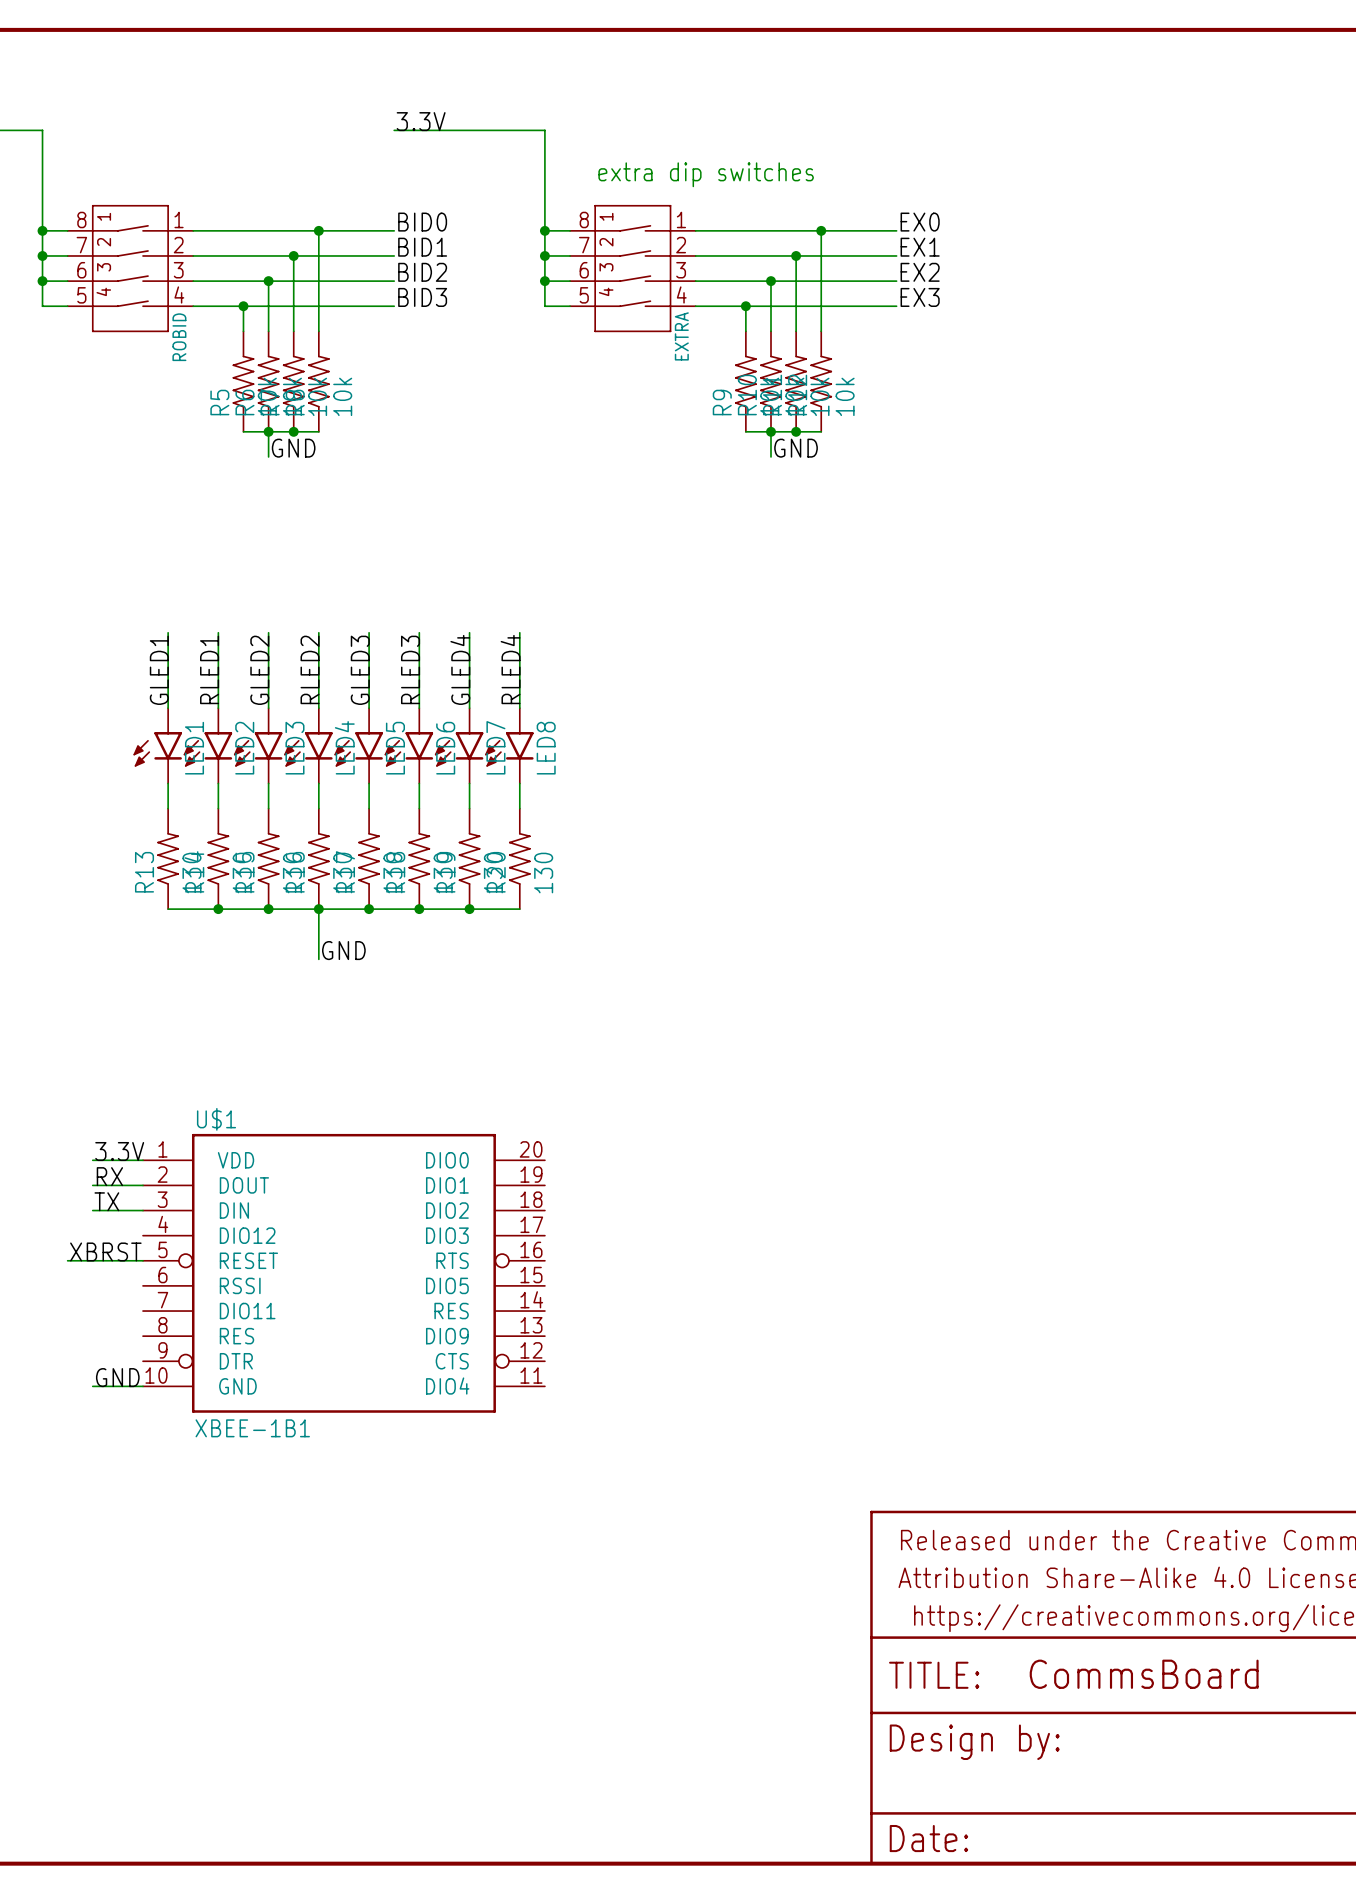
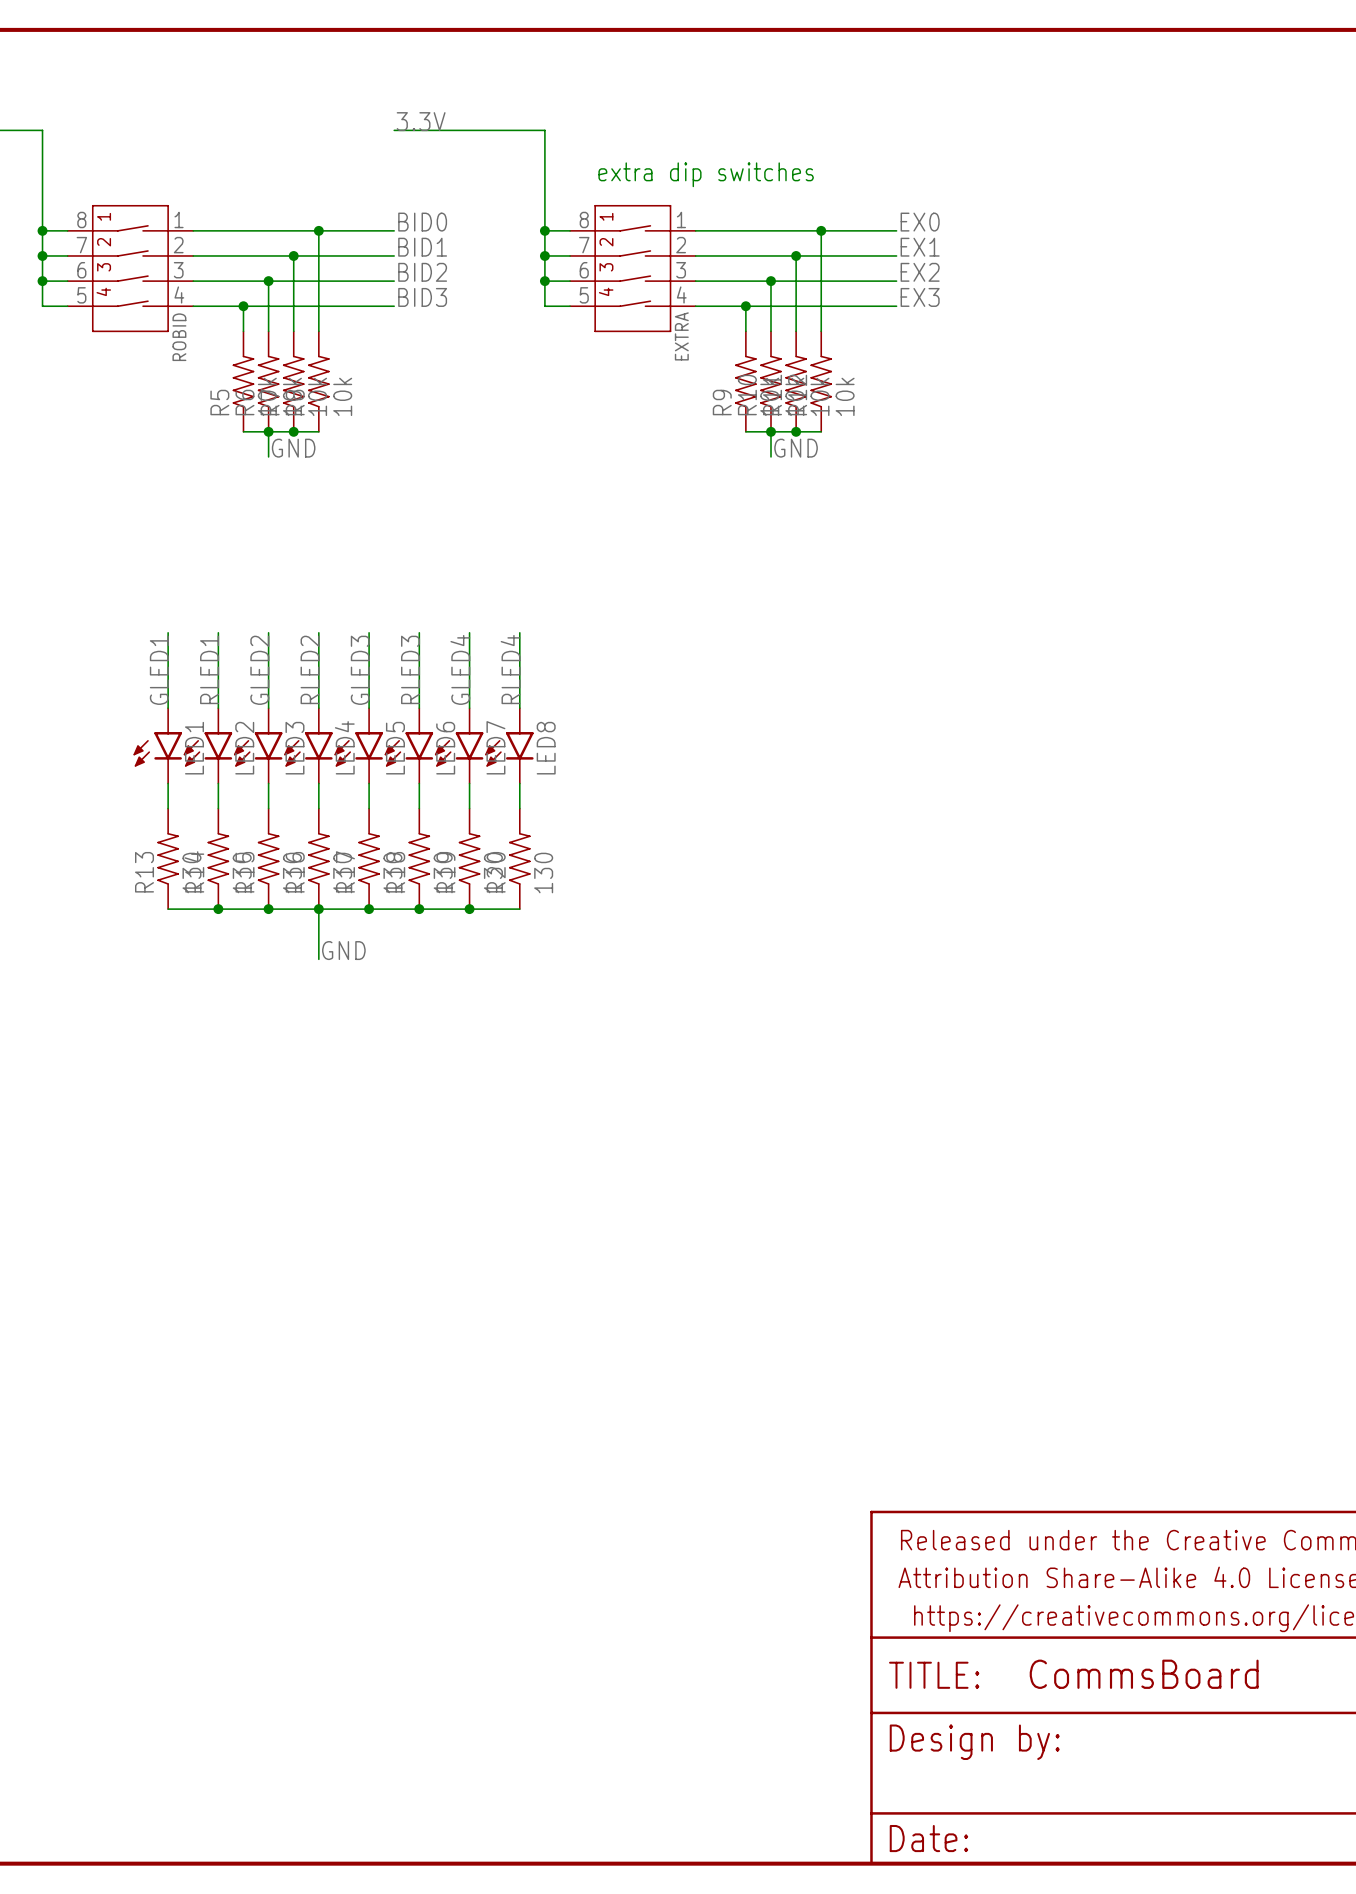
label: 3.3V (119, 1151) -> none
wire: (92, 1160) (143, 1160) -> none
label: RX (109, 1176) -> none
wire: (92, 1185) (143, 1185) -> none
label: TX (106, 1201) -> none
wire: (92, 1210) (143, 1210) -> none
label: XBRST (105, 1251) -> none
wire: (67, 1260) (143, 1260) -> none
U$1: XBEE-1B1 (343, 1273) -> none
label: GND (117, 1377) -> none
wire: (92, 1386) (143, 1386) -> none

